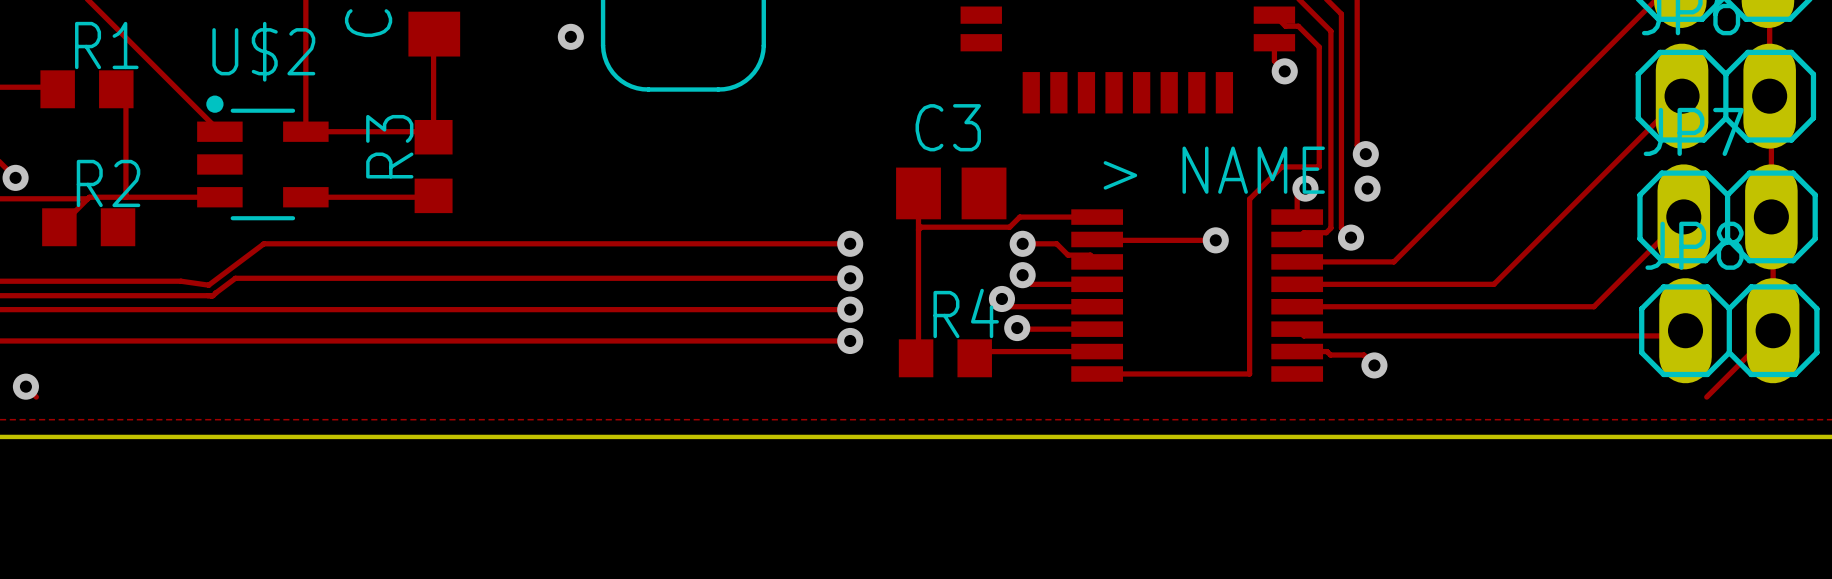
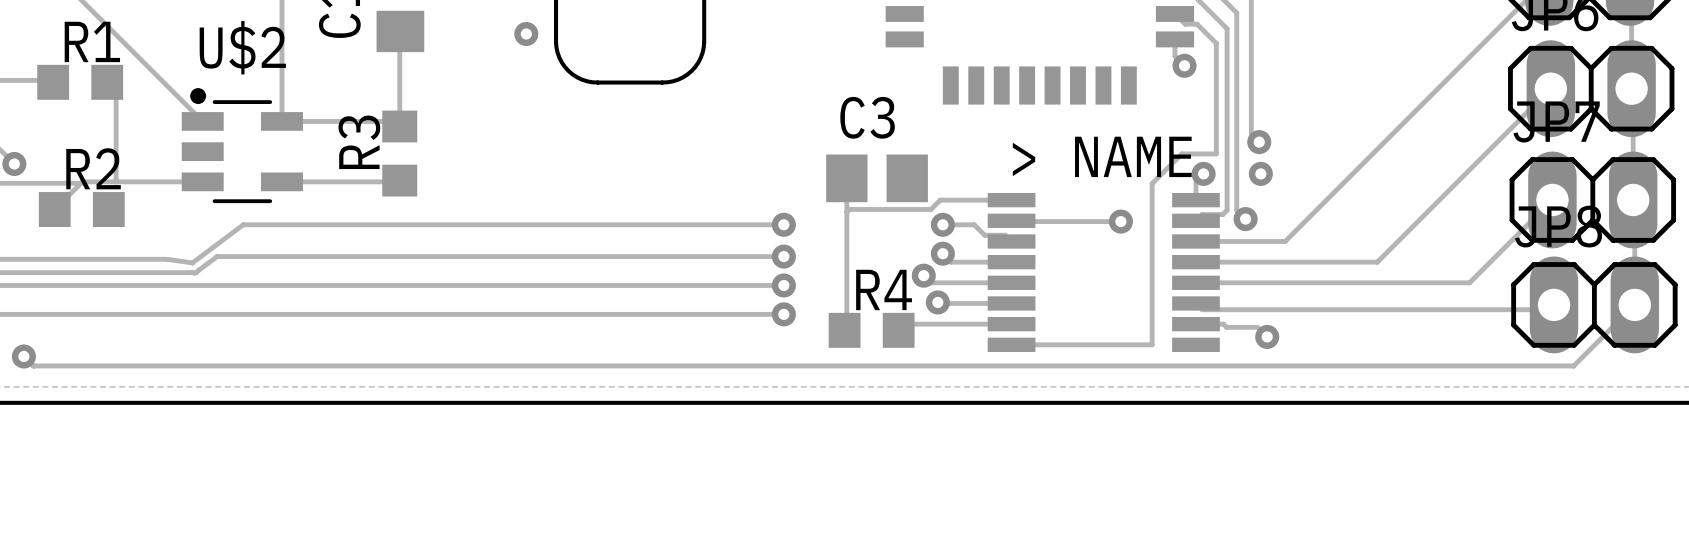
track: none -> (33, 365) (1573, 365)

